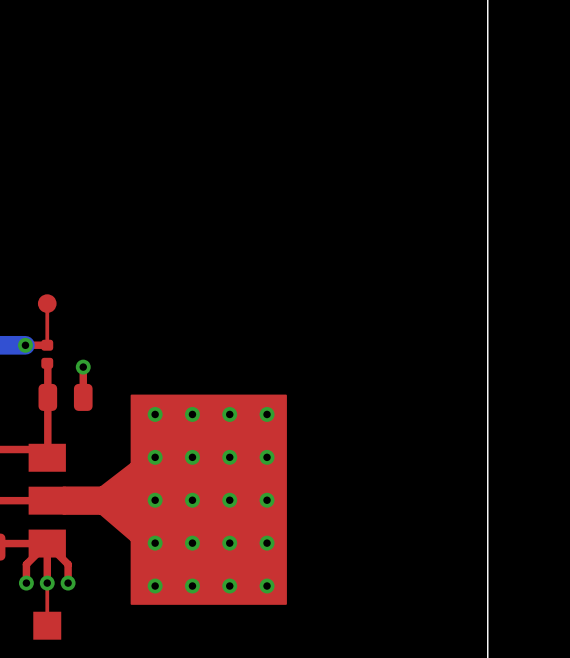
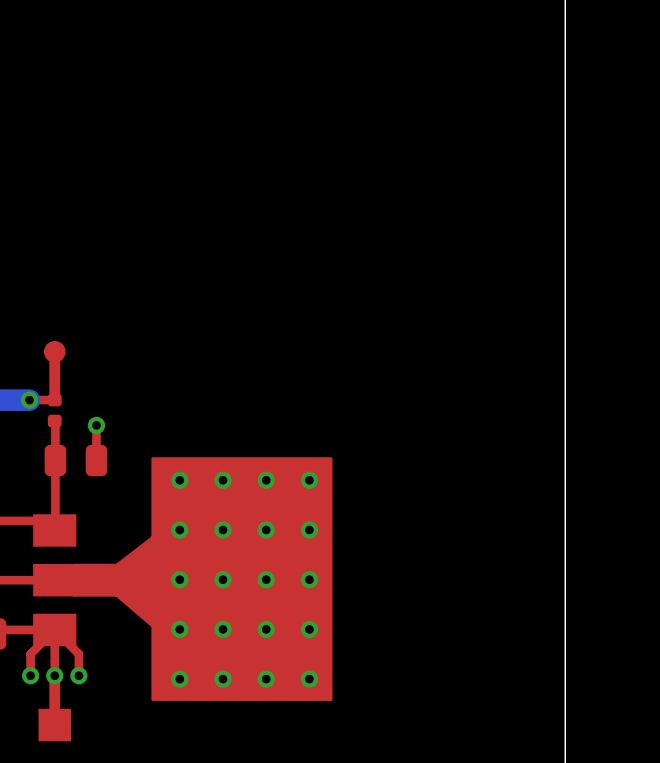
top track width: thin (47, 303) (47, 345) -> thick (54, 351) (54, 400)
top track width: thin (47, 583) (47, 625) -> thick (54, 675) (54, 725)

